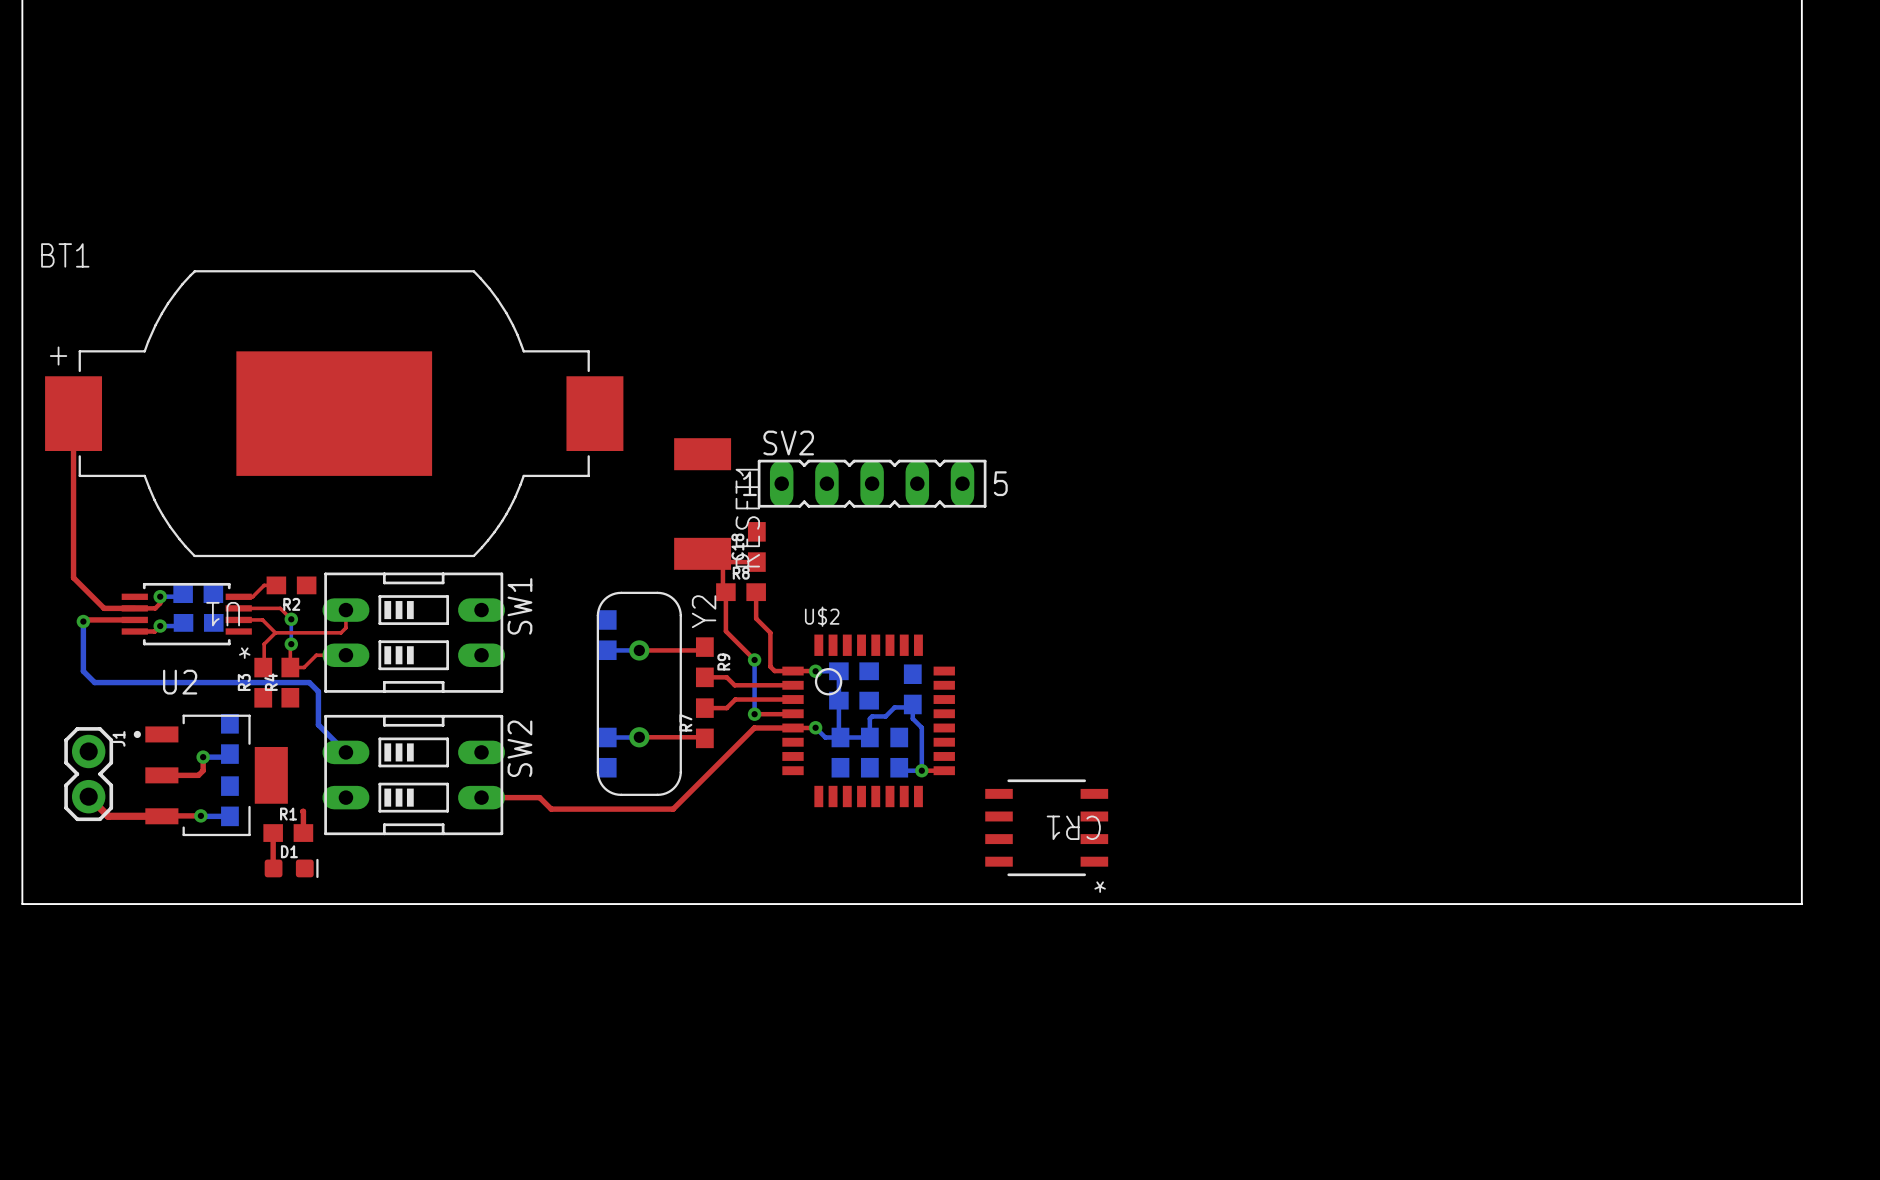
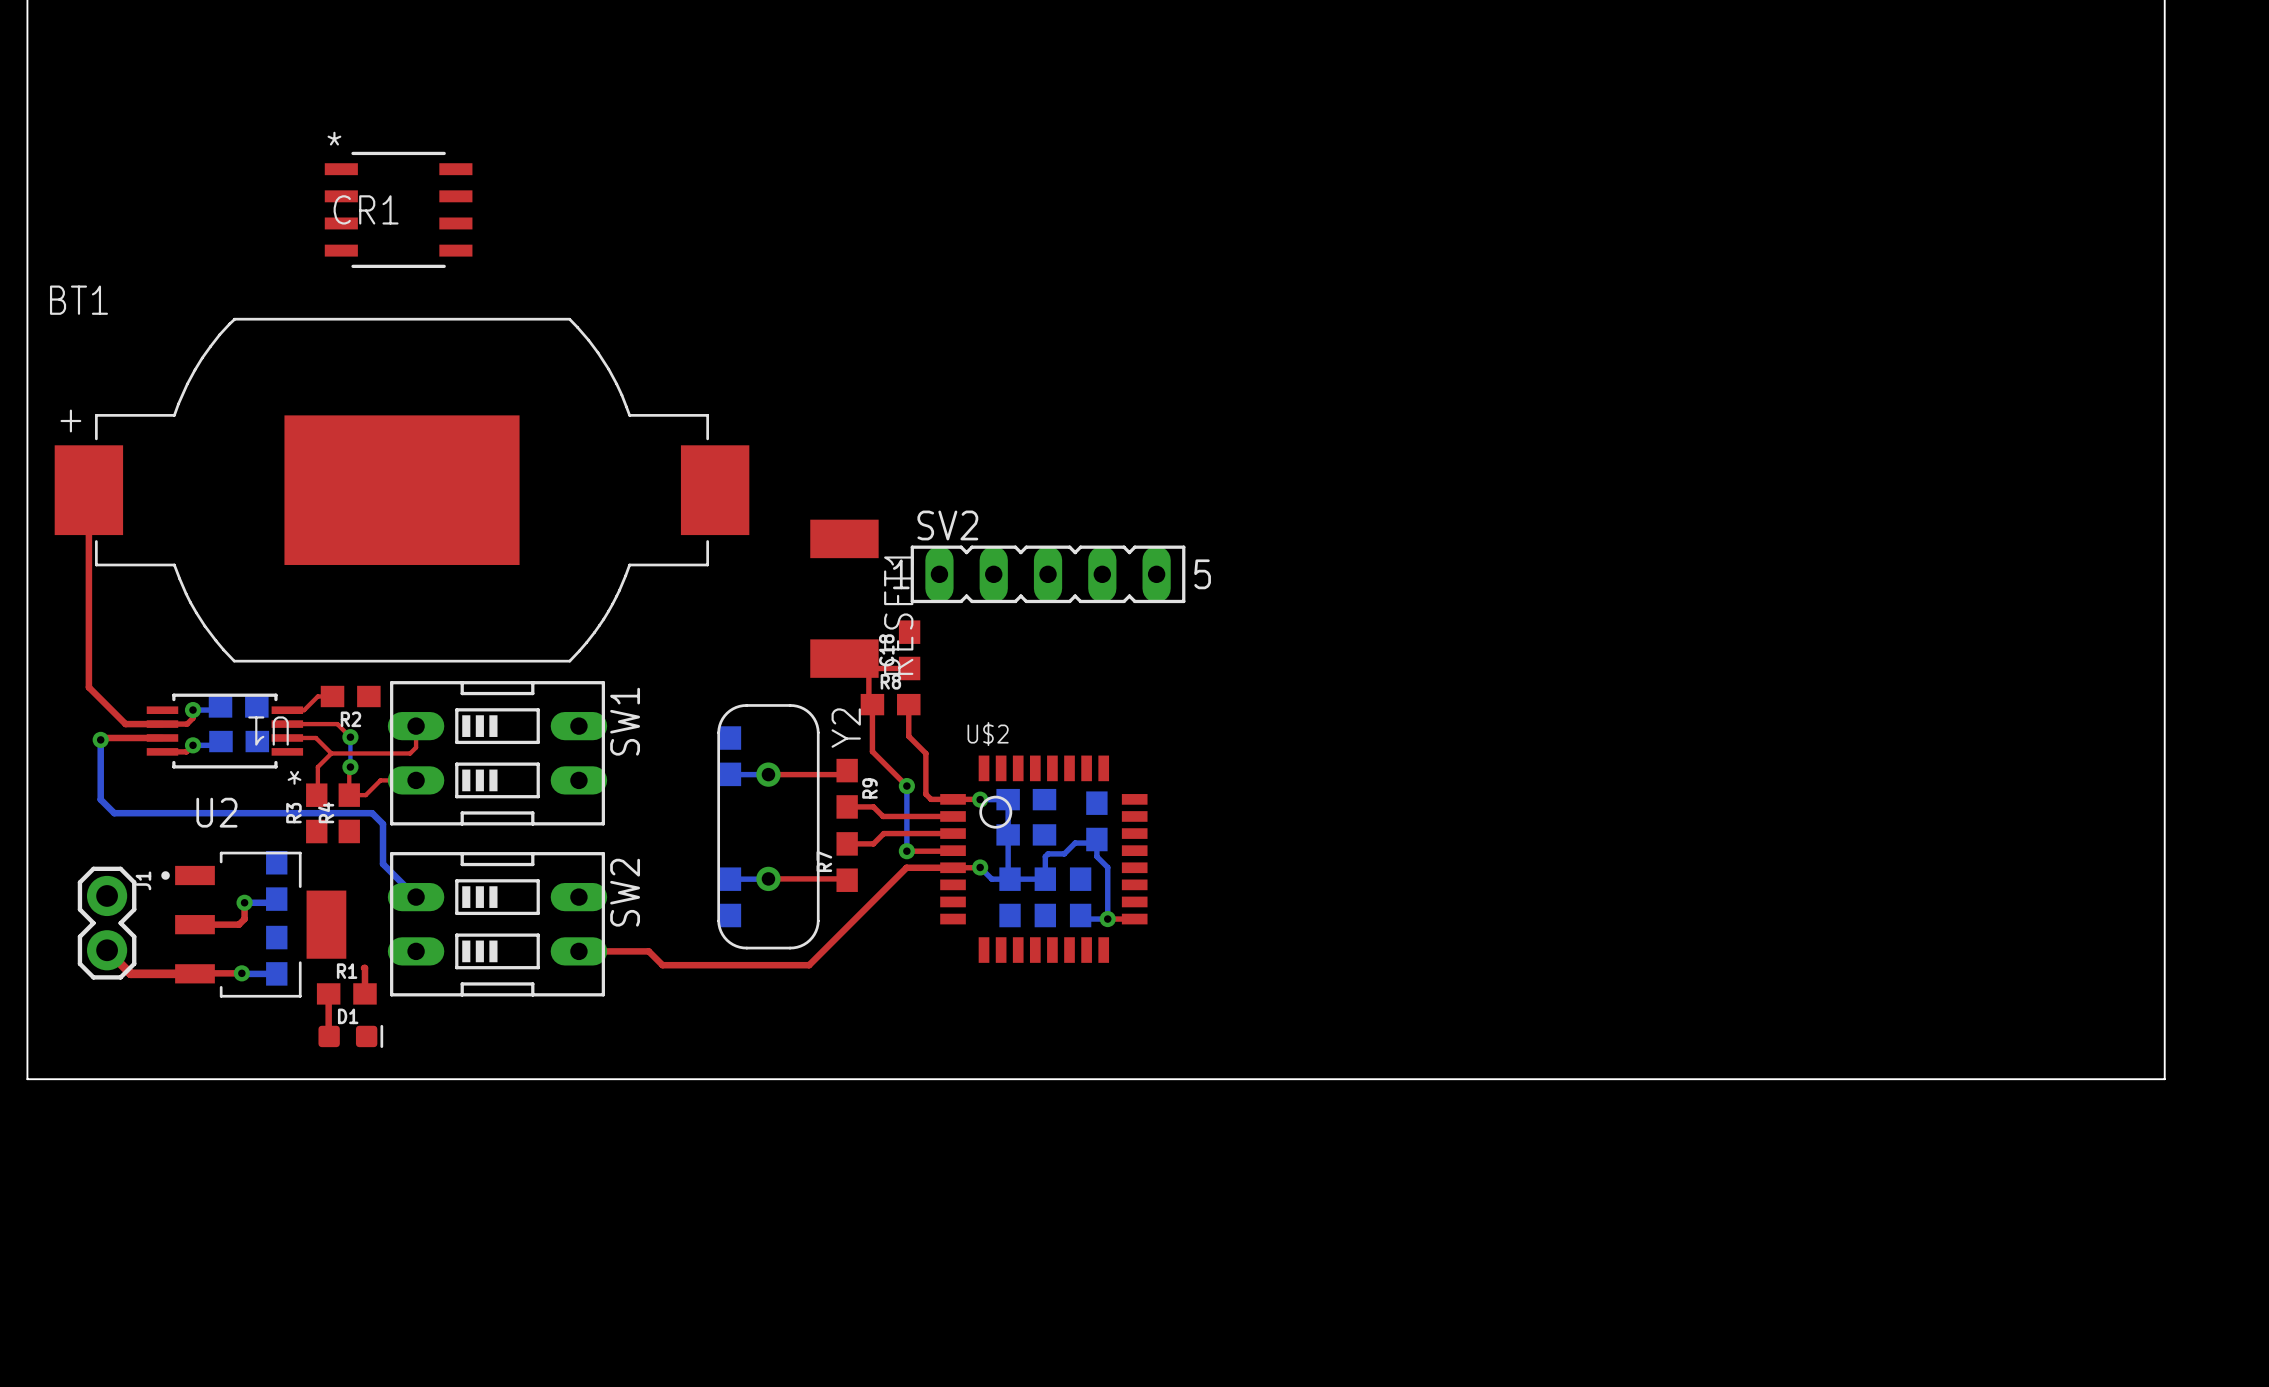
CR1 rotation: 0° (1046, 827) -> 180° (398, 209)
CR1 position: (1046, 827) -> (398, 209)

